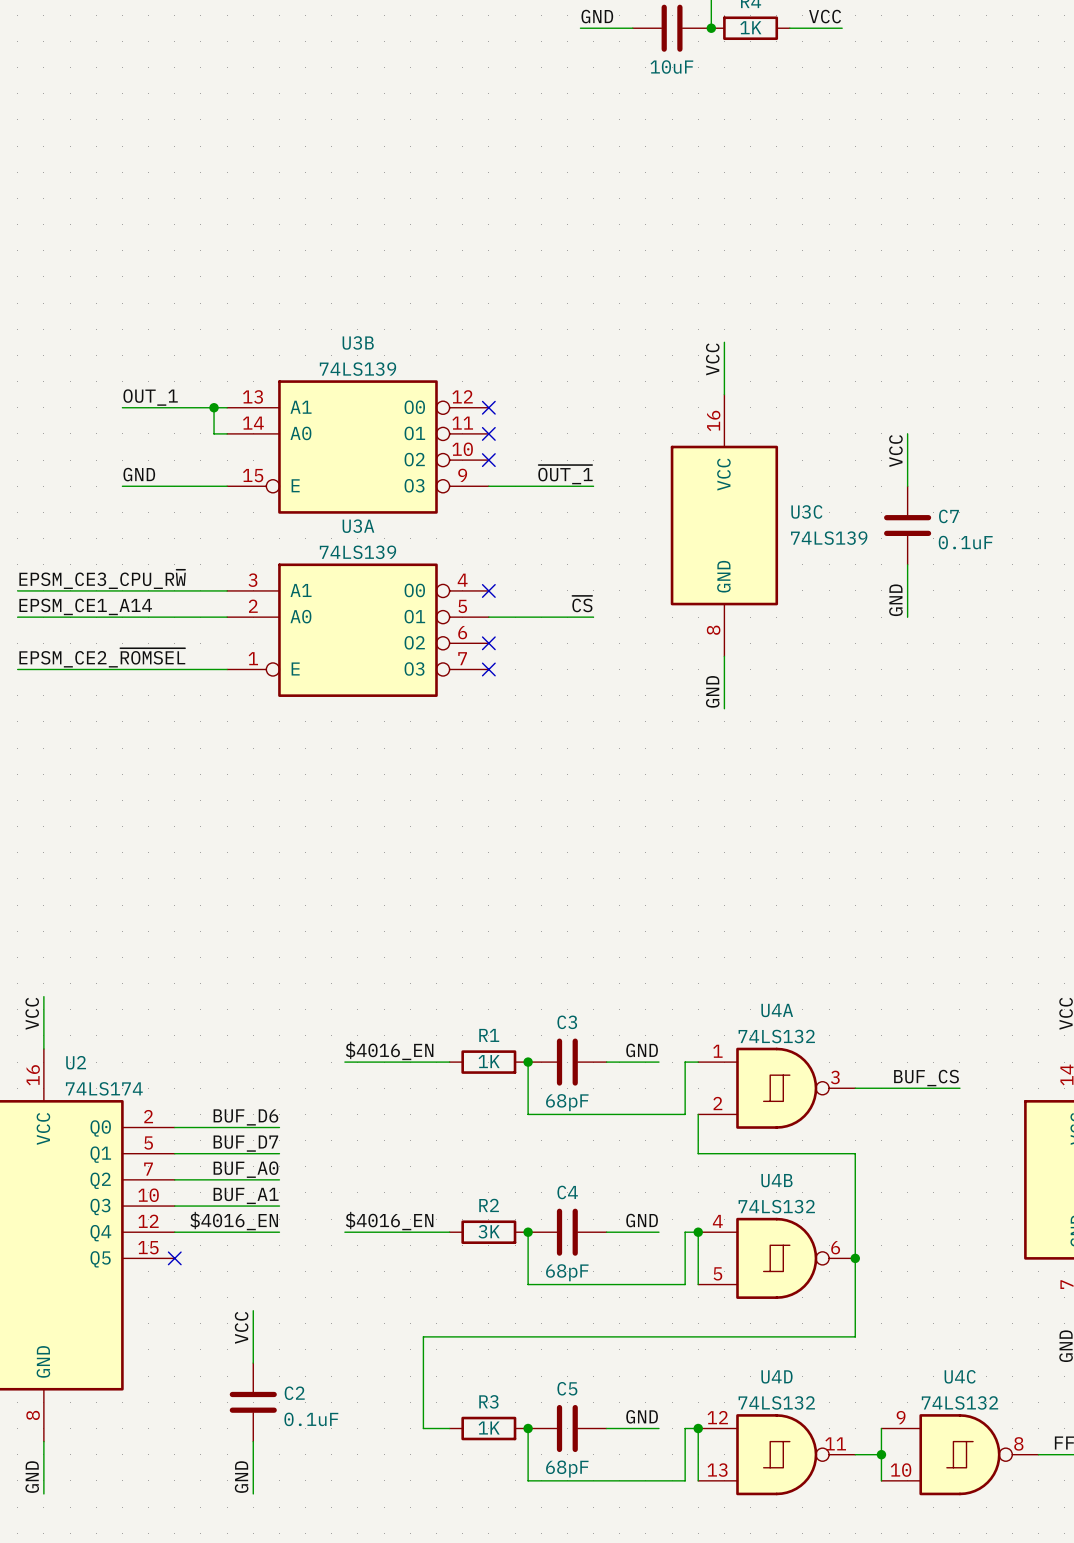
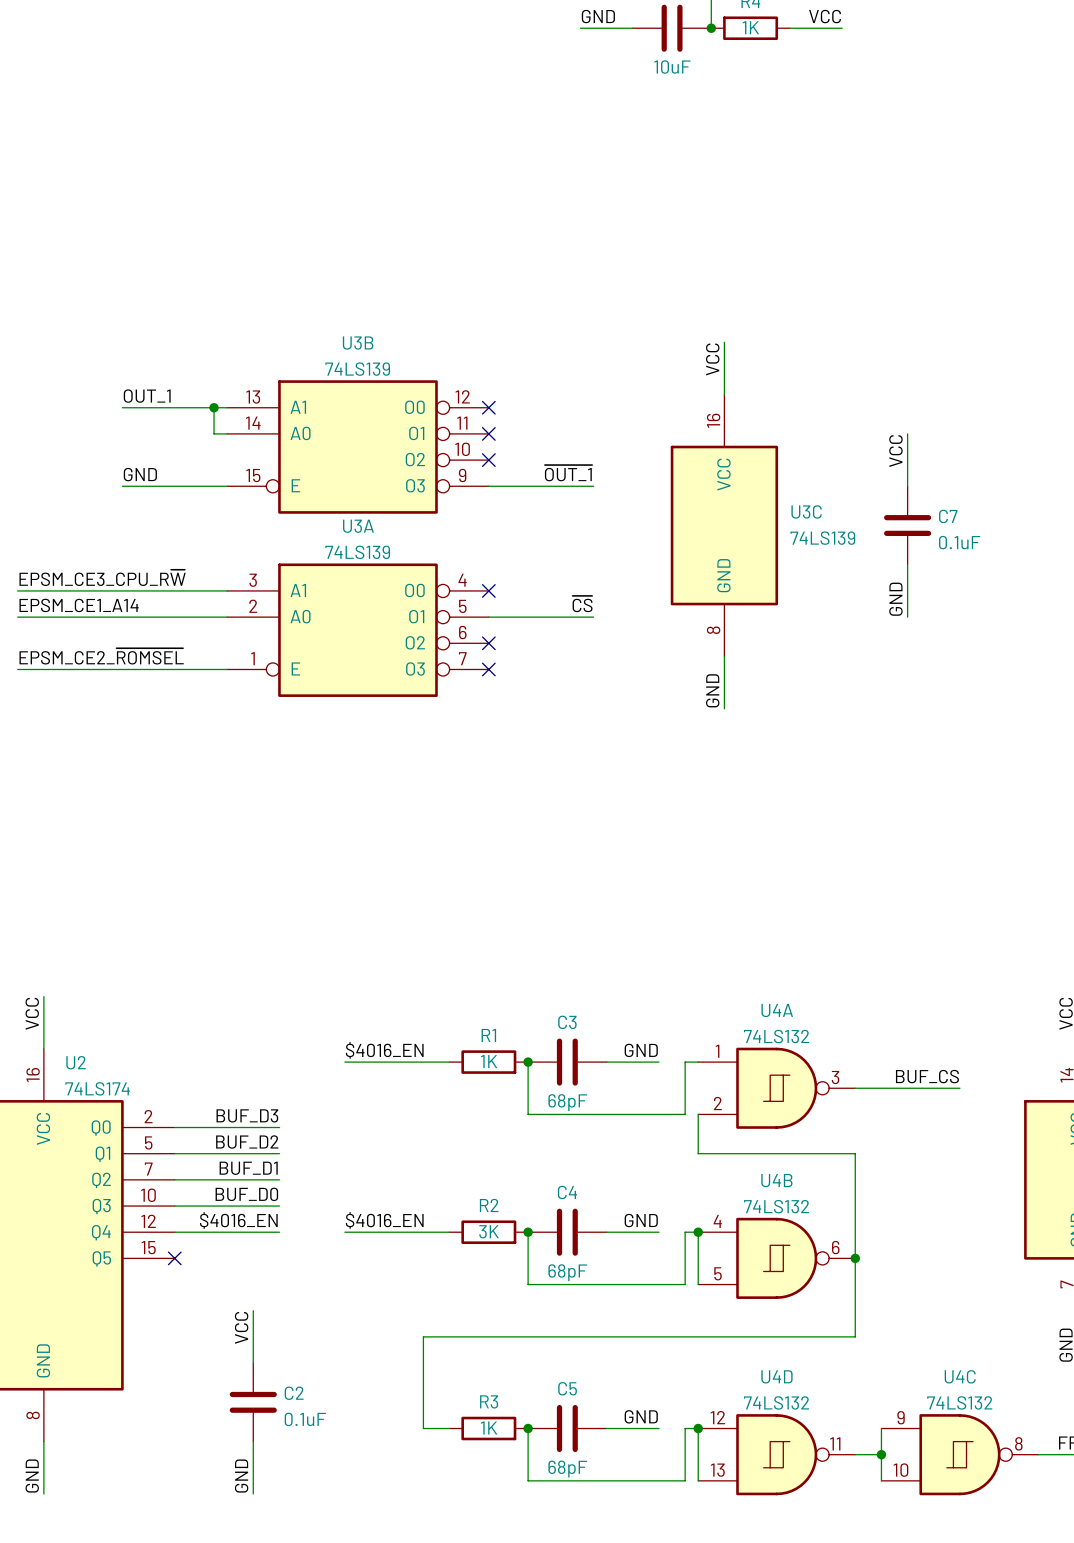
label: BUF_D6 (245, 1117) -> BUF_D3 (247, 1115)
label: BUF_D7 (245, 1143) -> BUF_D2 (247, 1142)
label: BUF_A0 (246, 1169) -> BUF_D1 (248, 1168)
label: BUF_A1 (246, 1195) -> BUF_D0 (246, 1194)

